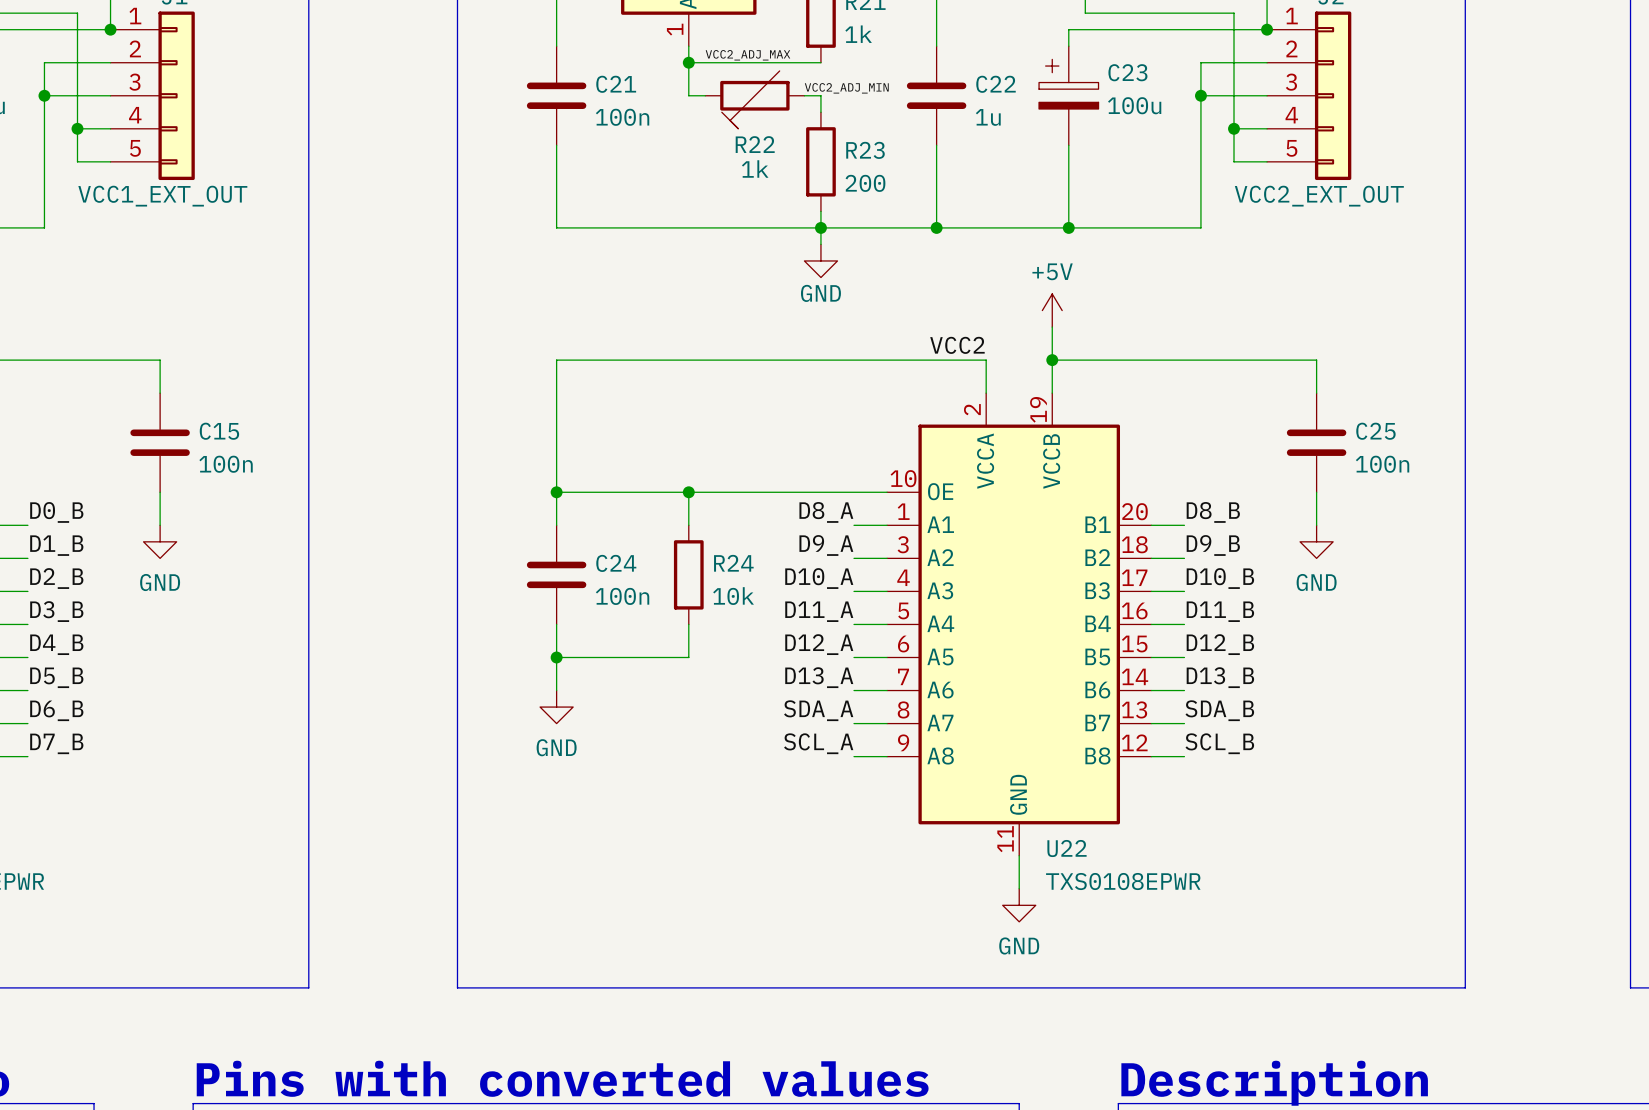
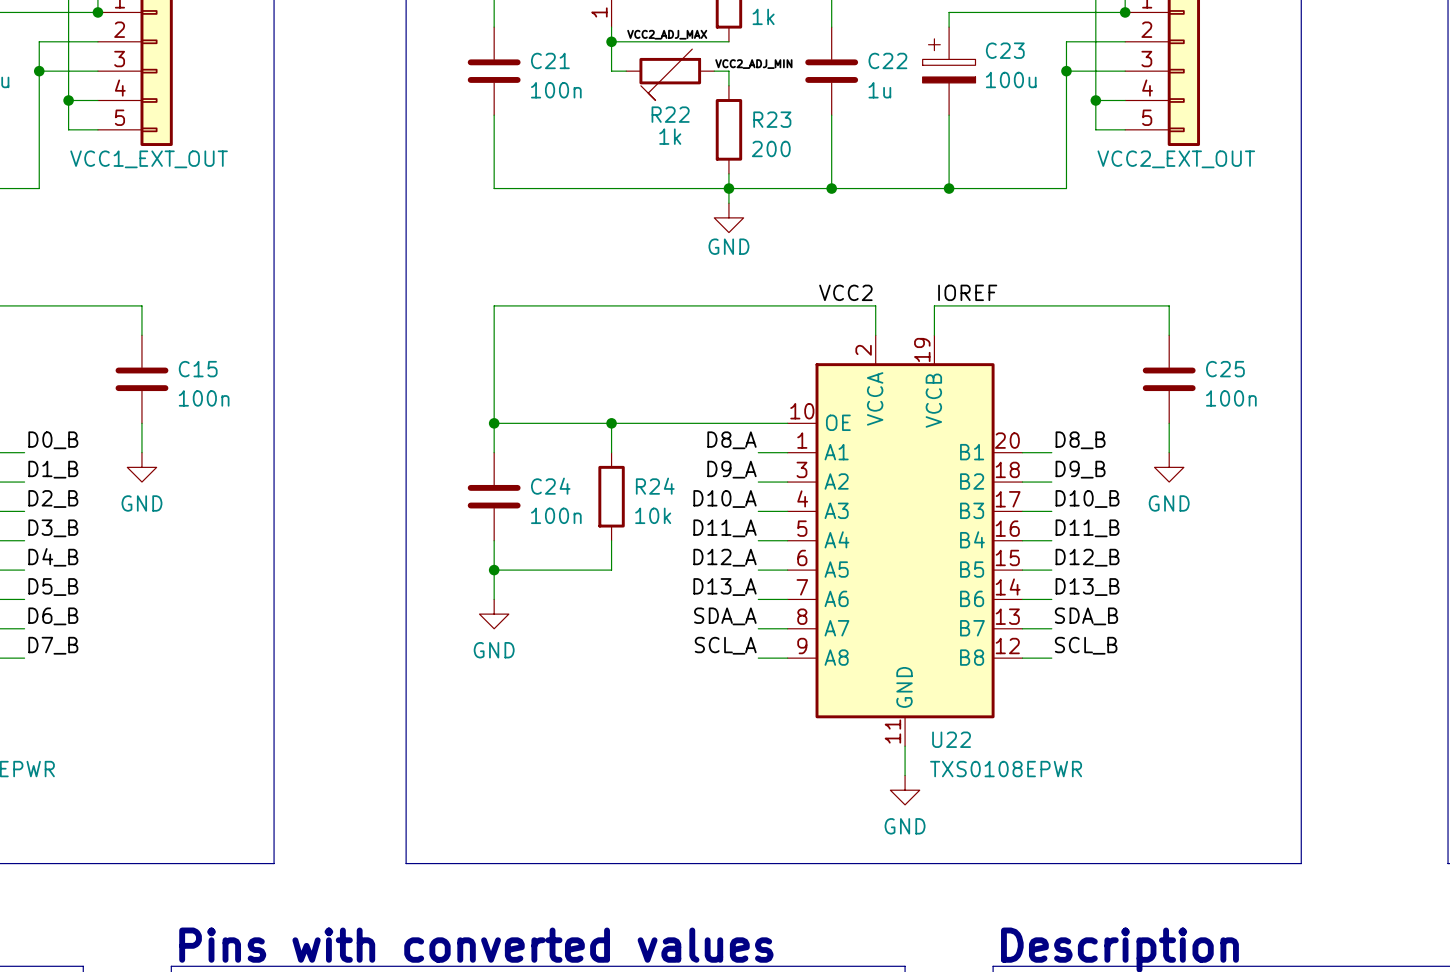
power symbol: +5V (1052, 310) -> none
wire: (1052, 327) (1052, 360) -> none
label: none -> IOREF (967, 292)
junction: (1052, 360) -> none

